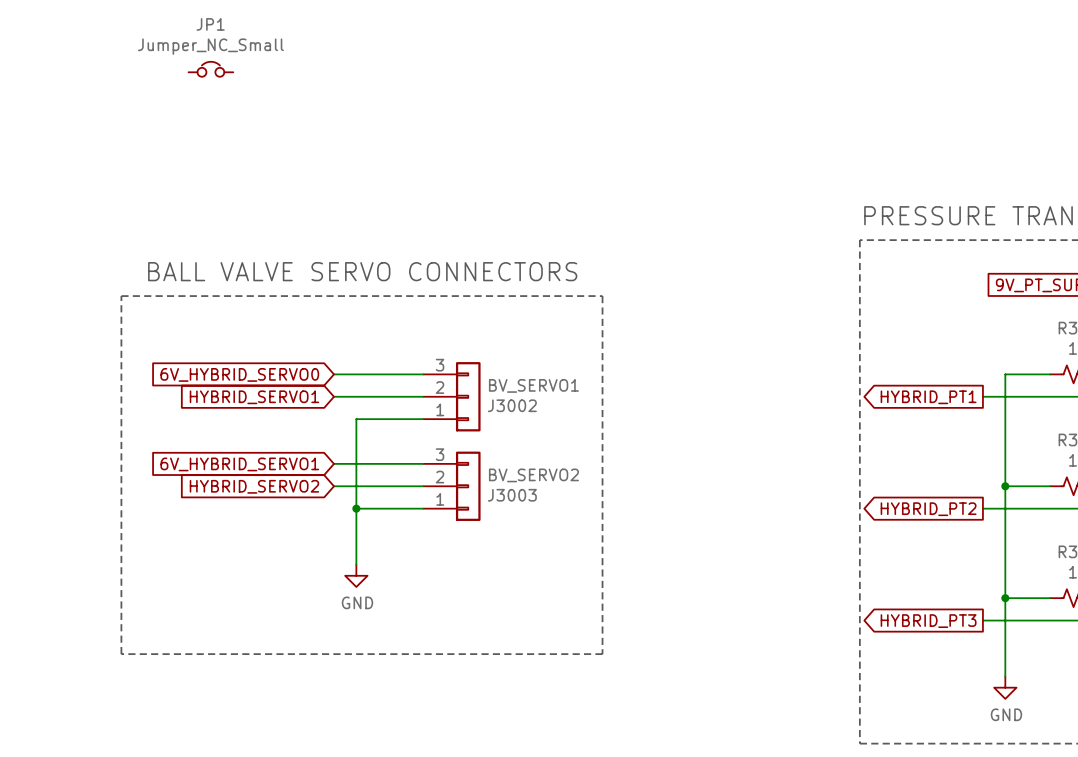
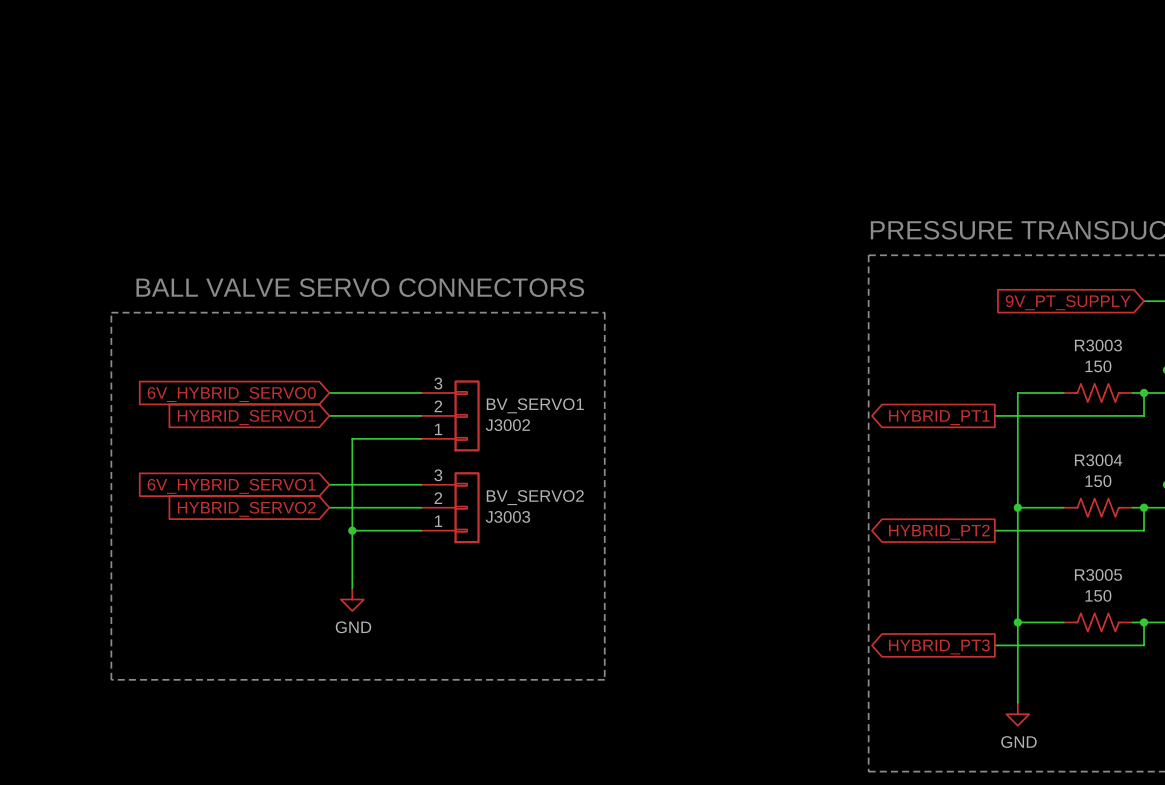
JP1: Jumper_NC_Small (210, 69) -> none

